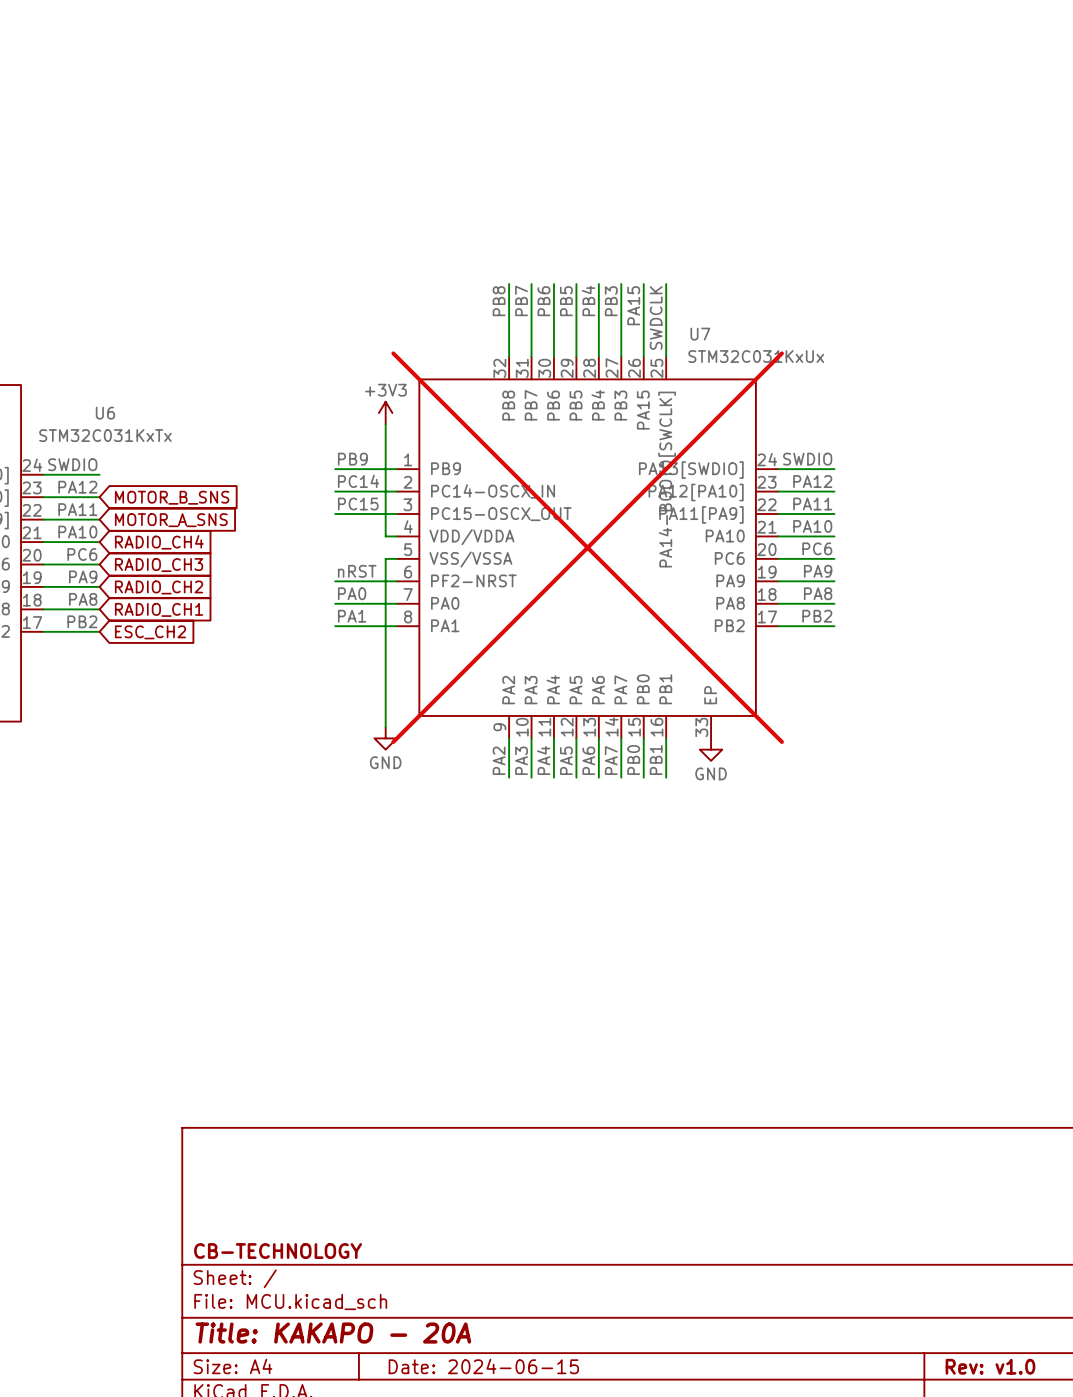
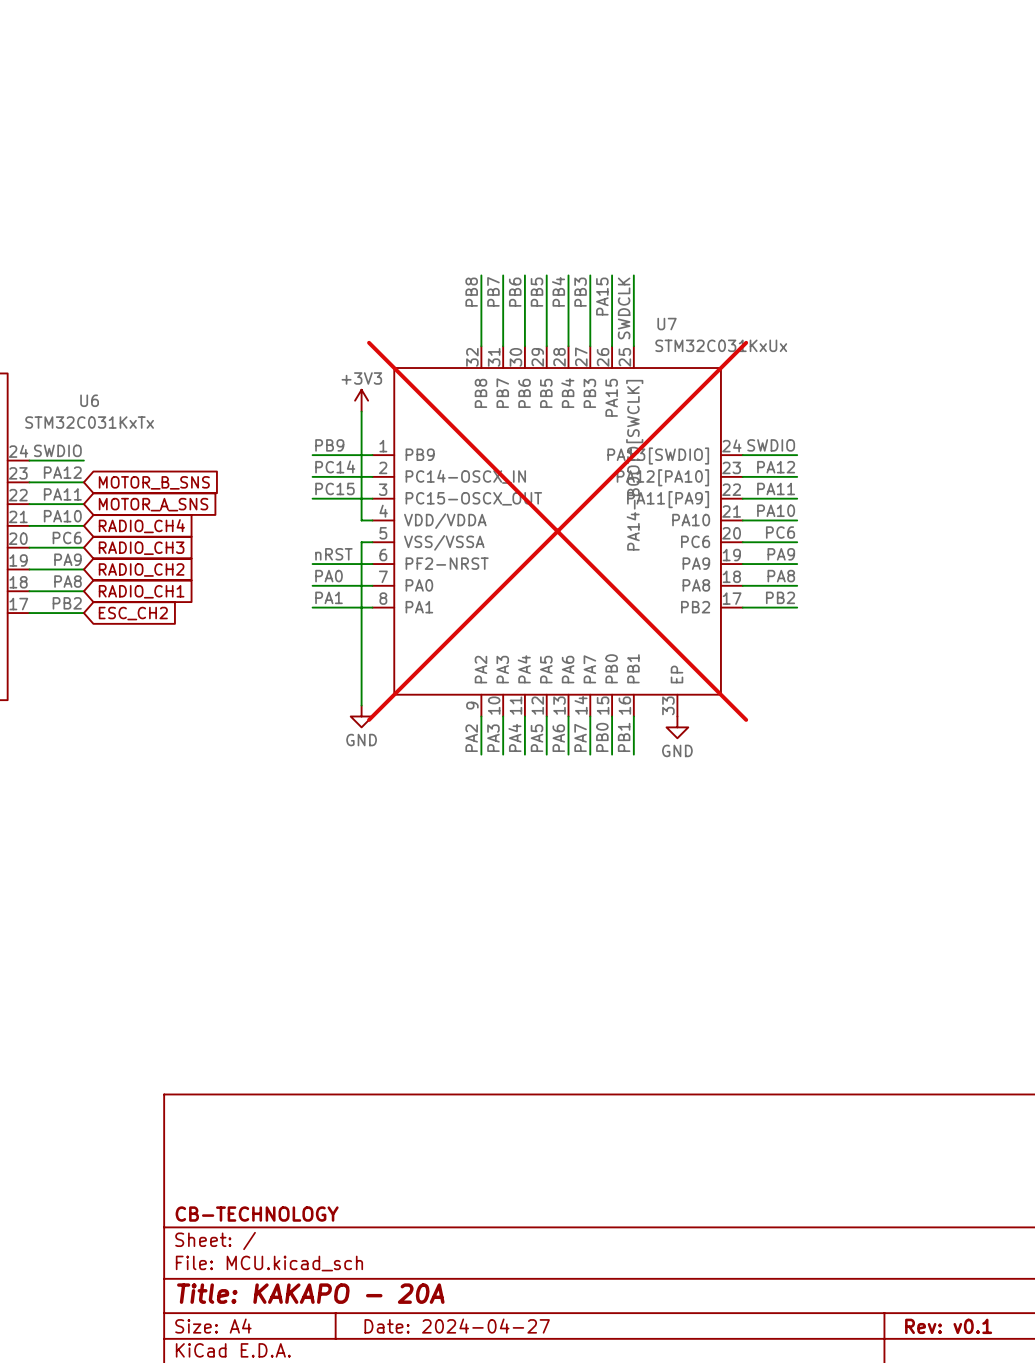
title block: Date: 2024-06-15 (483, 1366) -> Date: 2024-04-27 (457, 1326)
title block: Rev: v1.0 (990, 1366) -> Rev: v0.1 (948, 1326)

